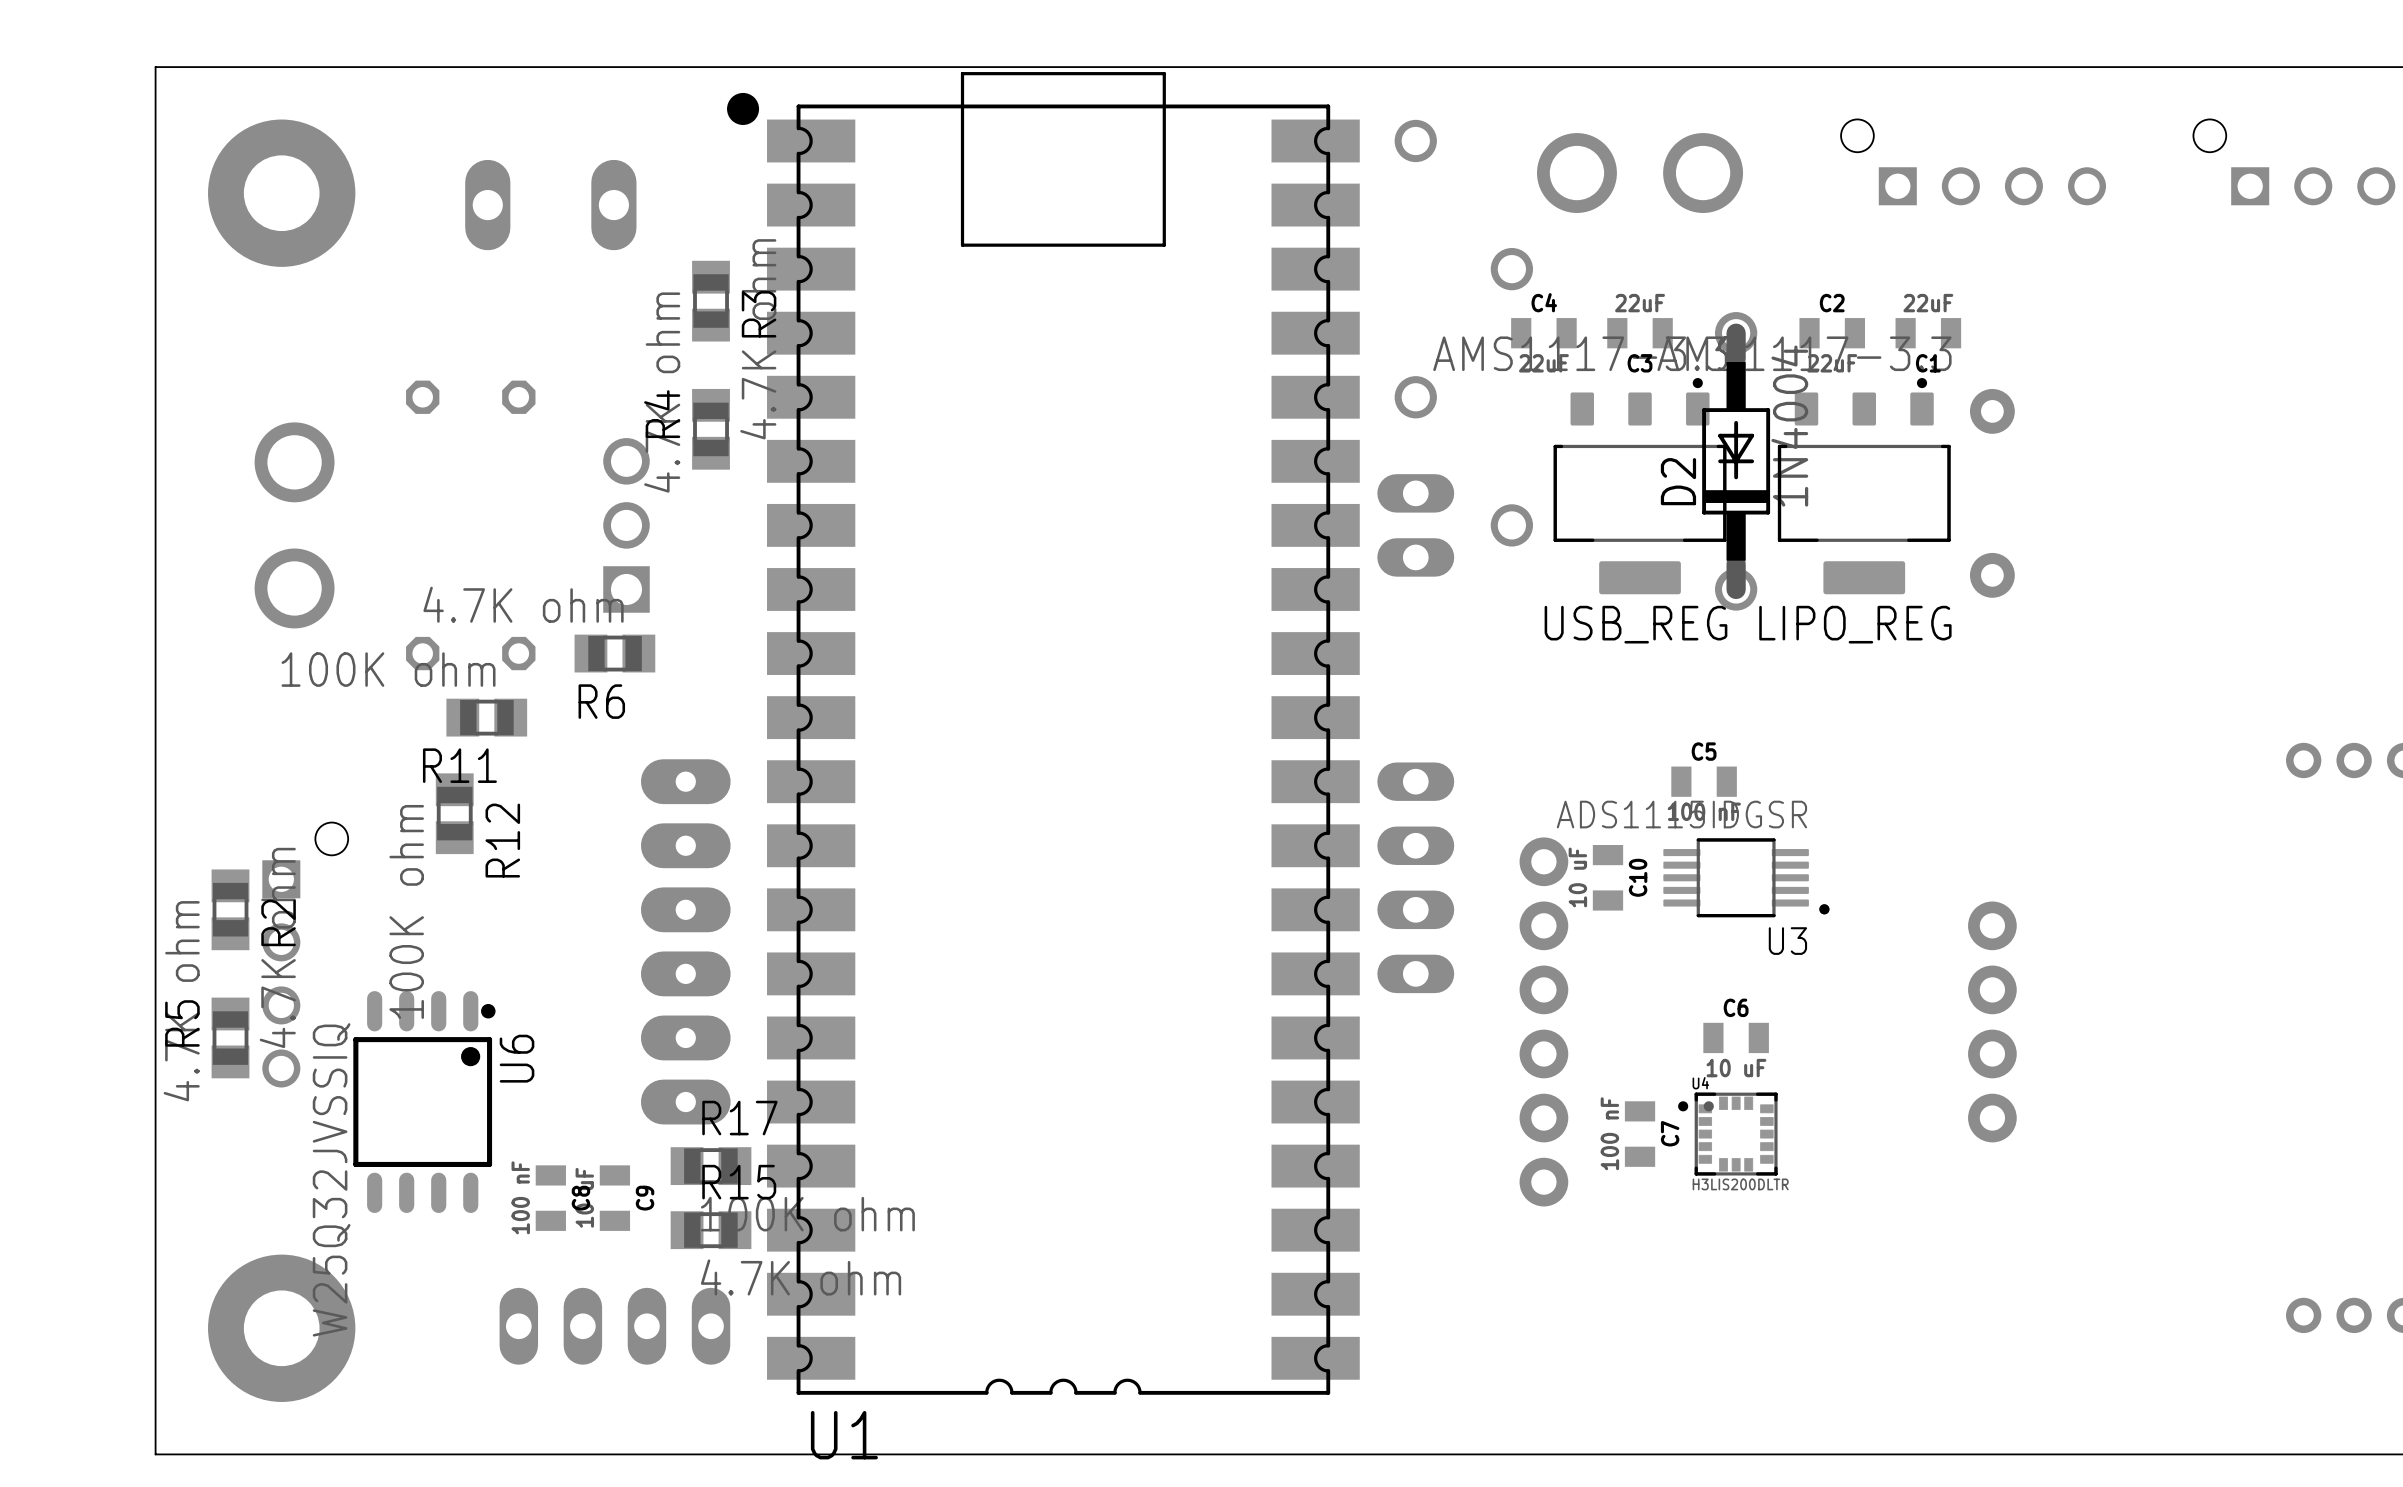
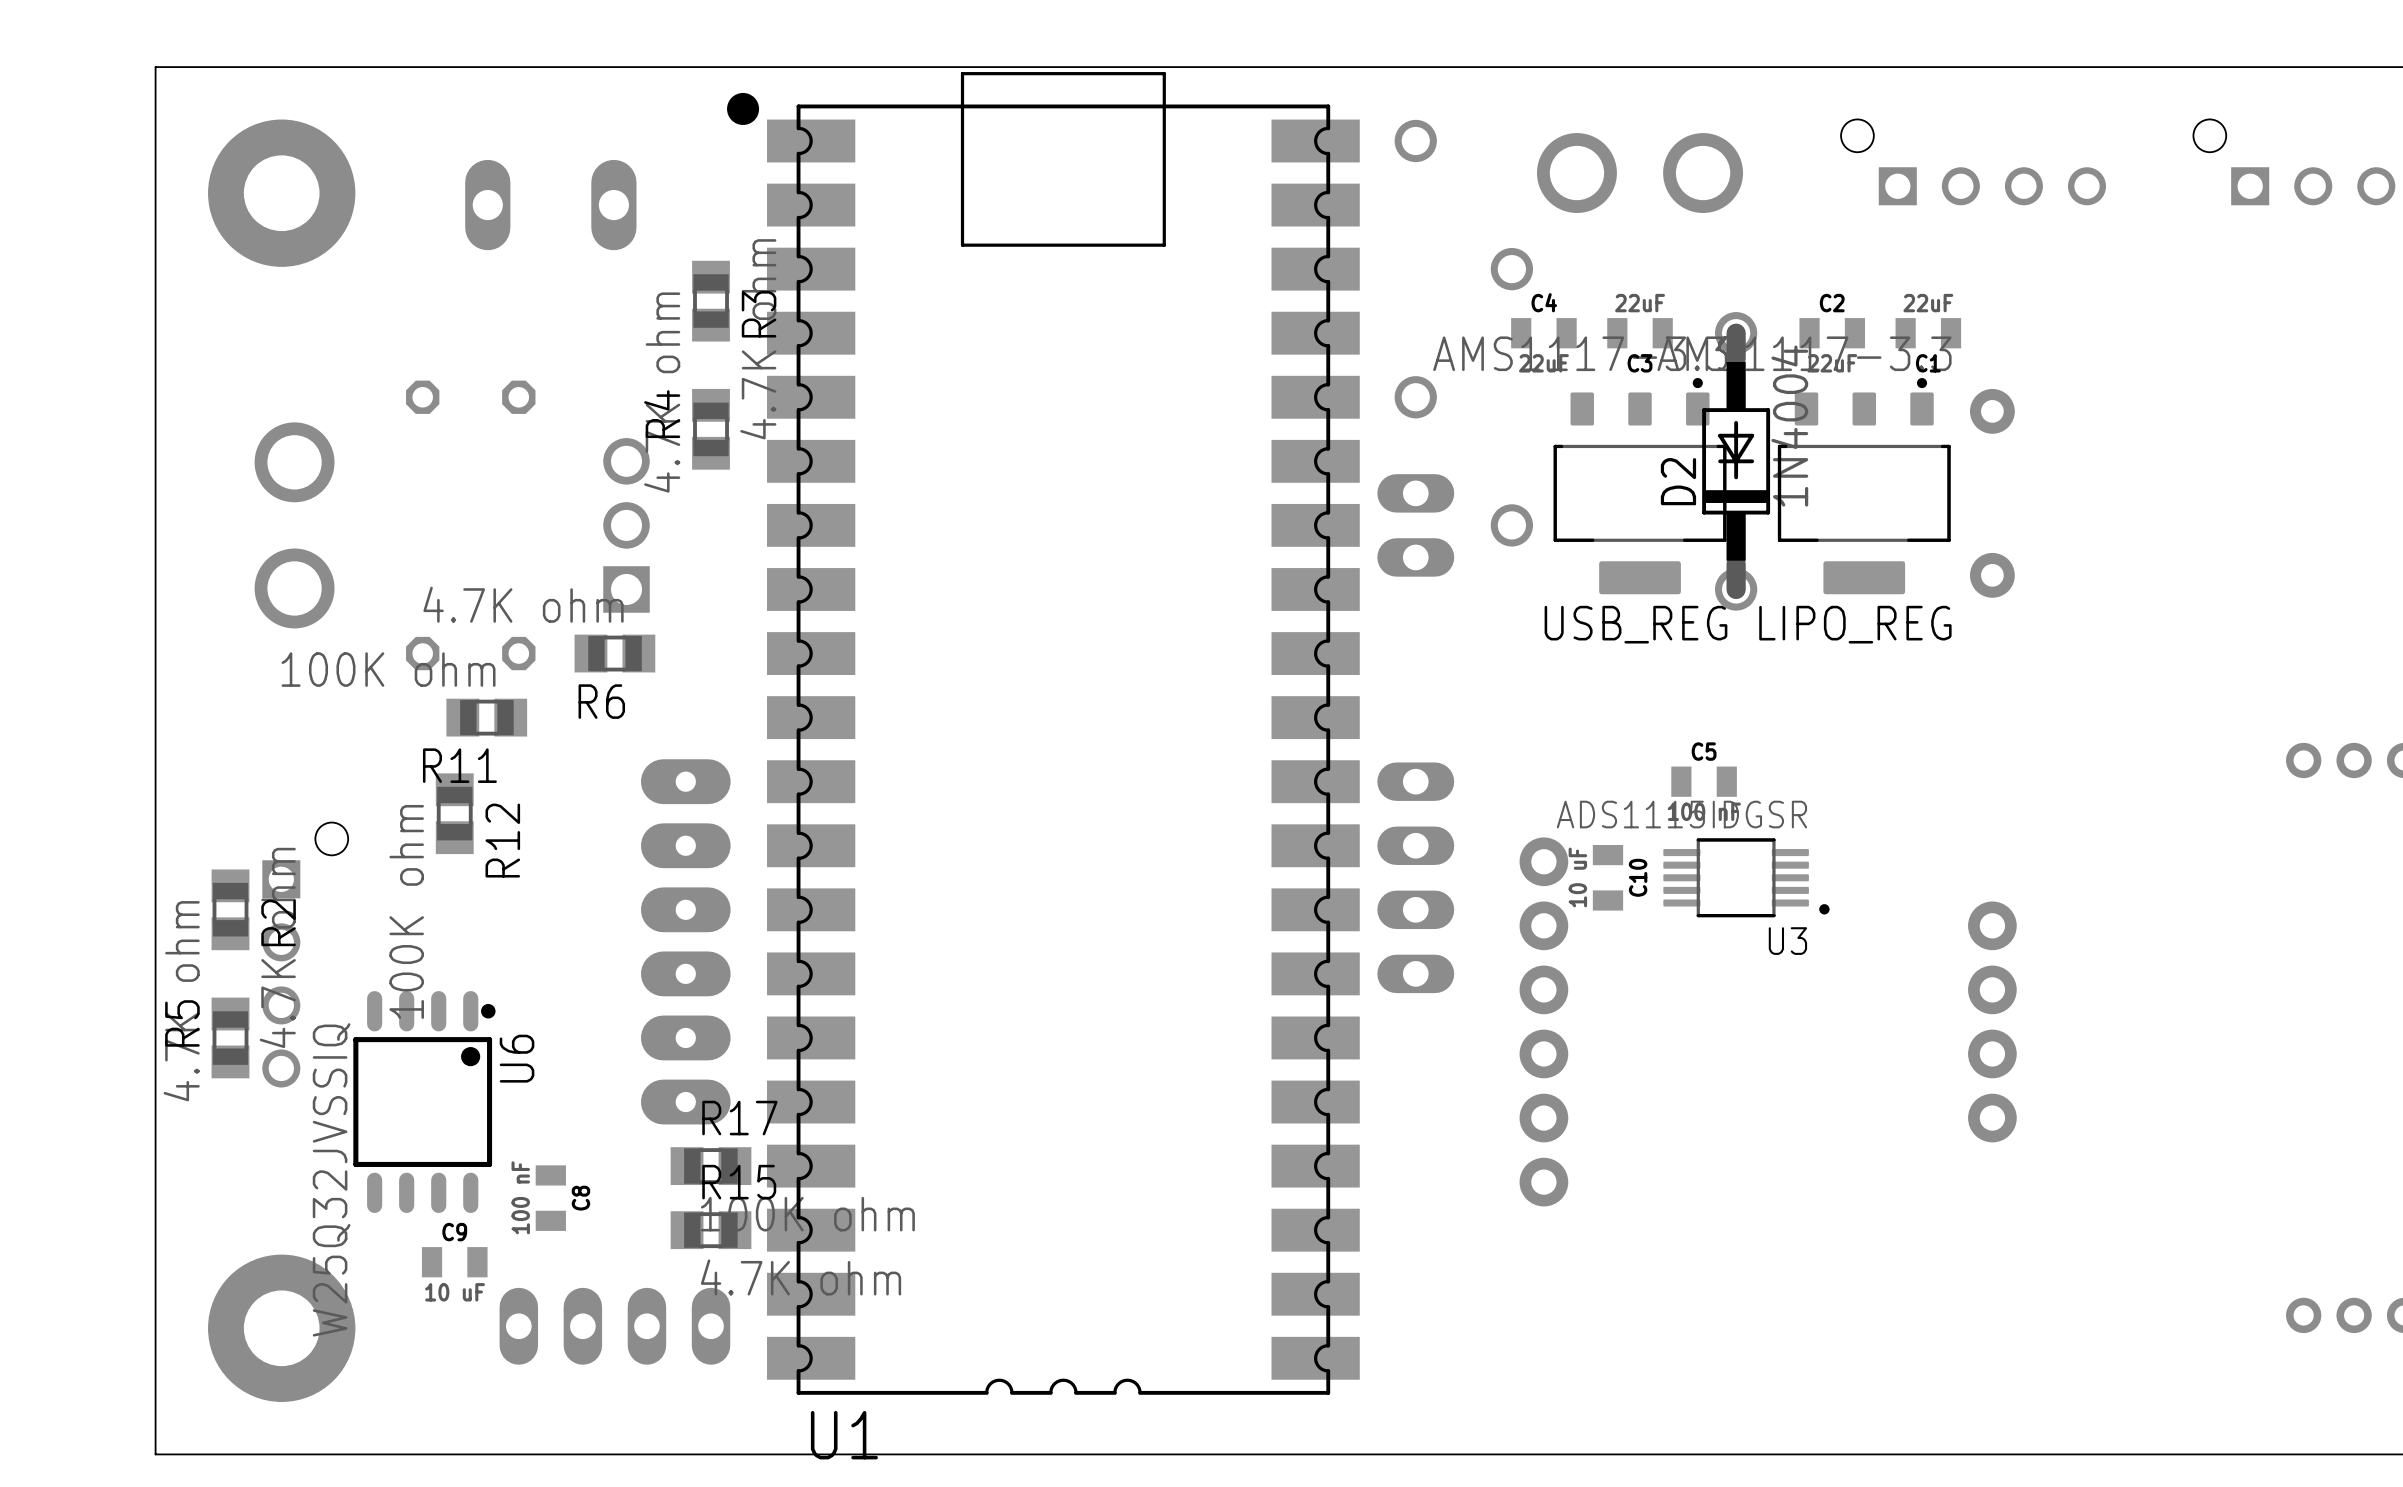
C6: 10 uF (1736, 1037) -> none
C7: 100 nF (1640, 1134) -> none
U4: H3LIS200DLTR (1727, 1134) -> none
C9 rotation: 0° (614, 1198) -> 90° clockwise (454, 1262)
C9 position: (614, 1198) -> (454, 1262)

